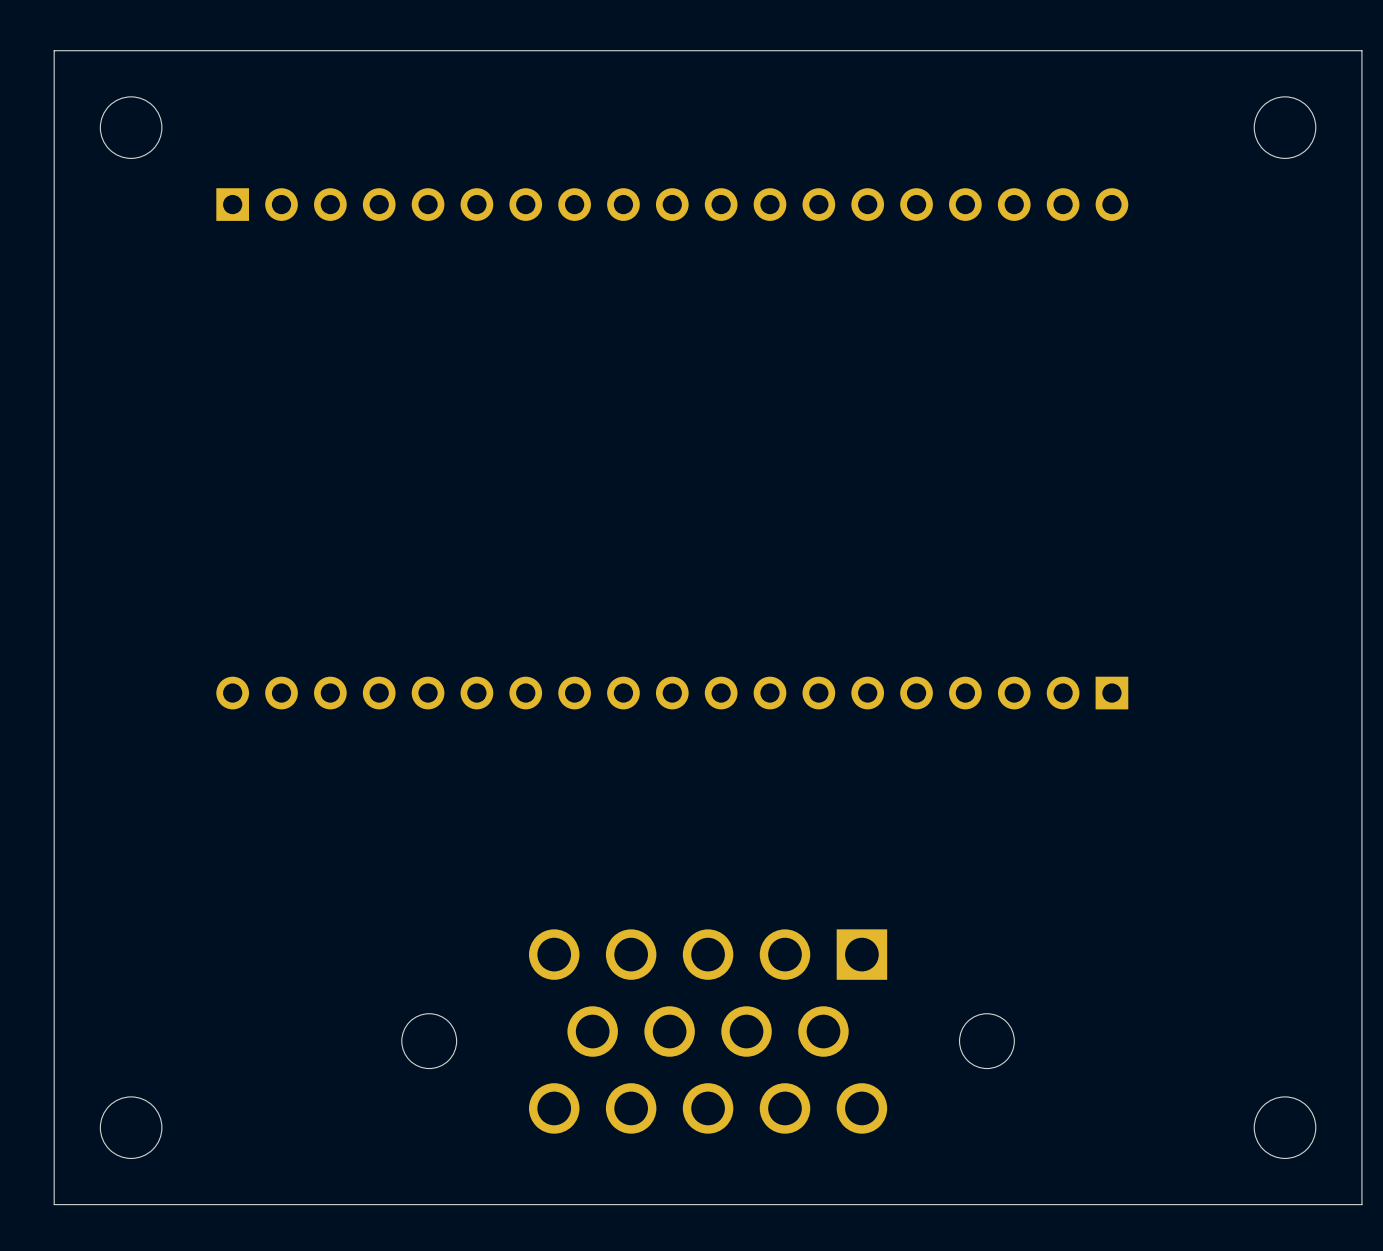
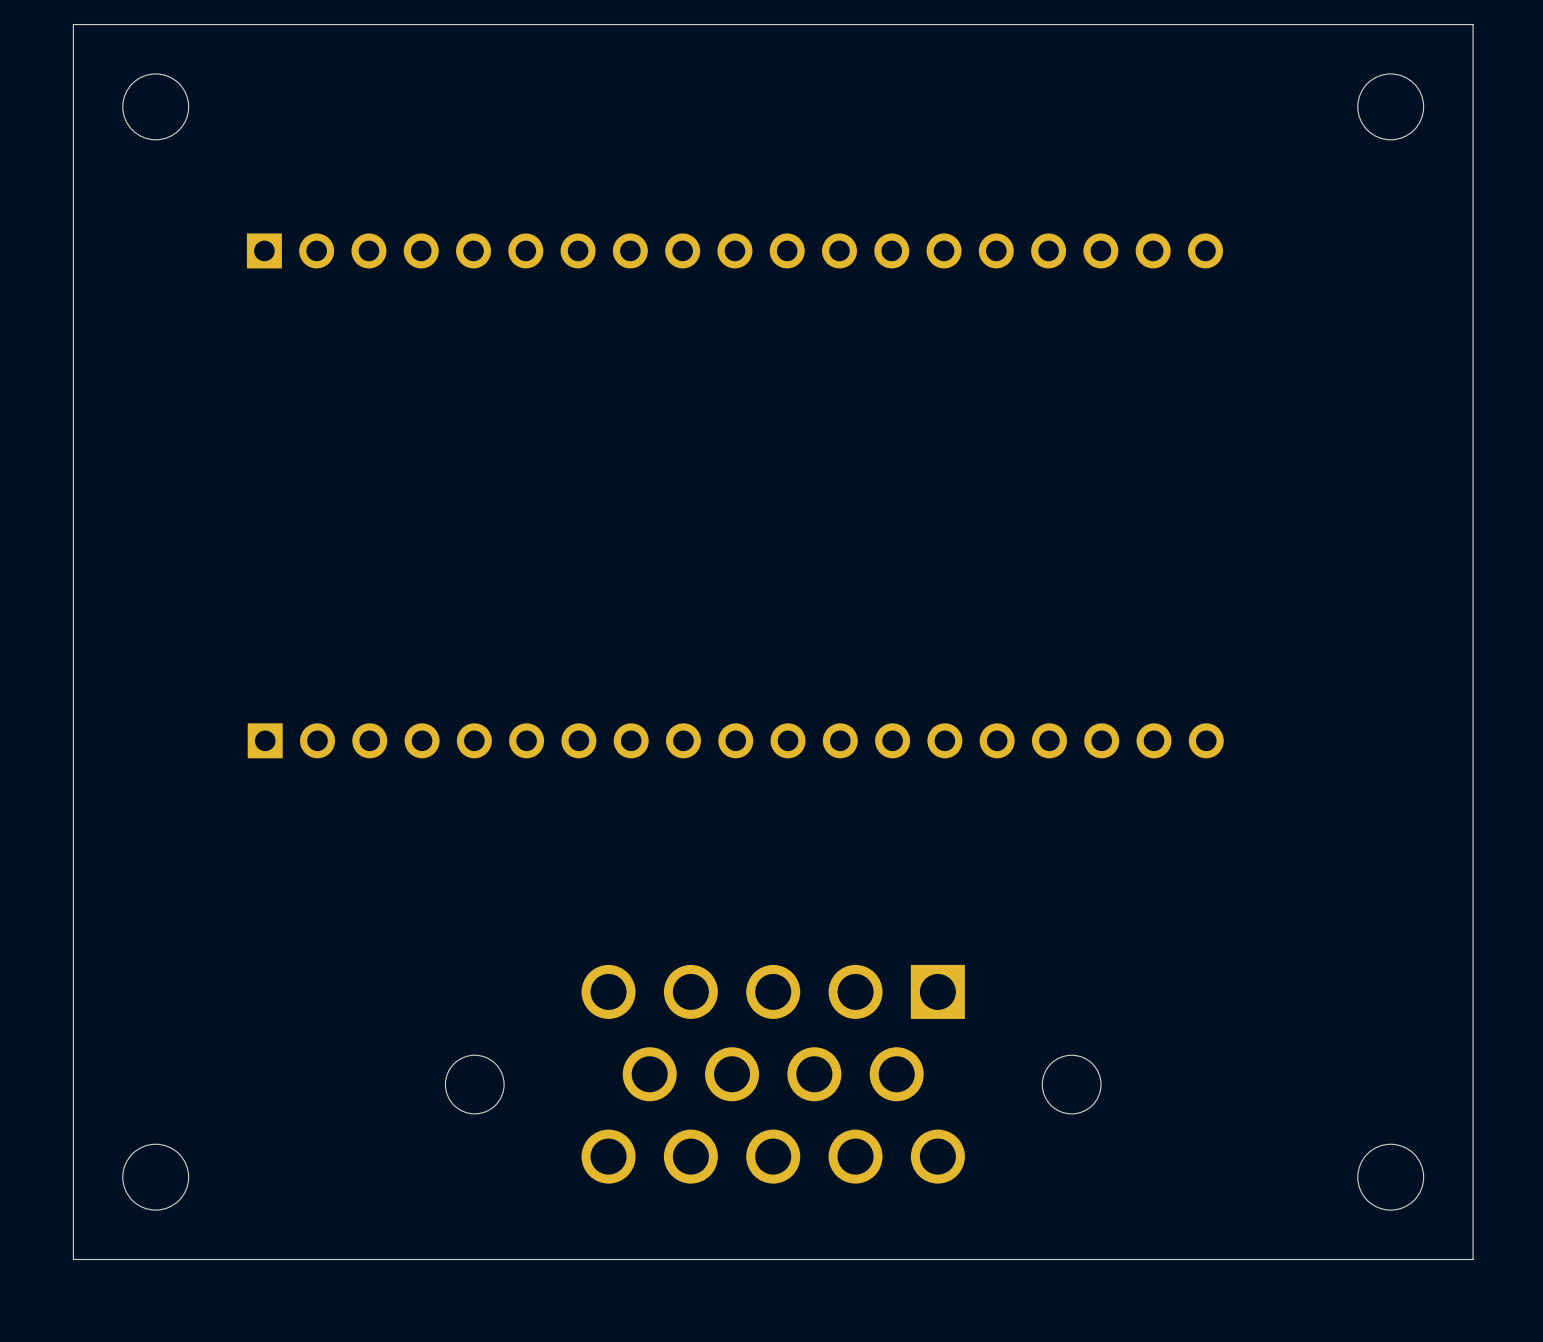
part position: (672, 204) -> (734, 250)
part rotation: 0° (672, 693) -> 180° (735, 740)

